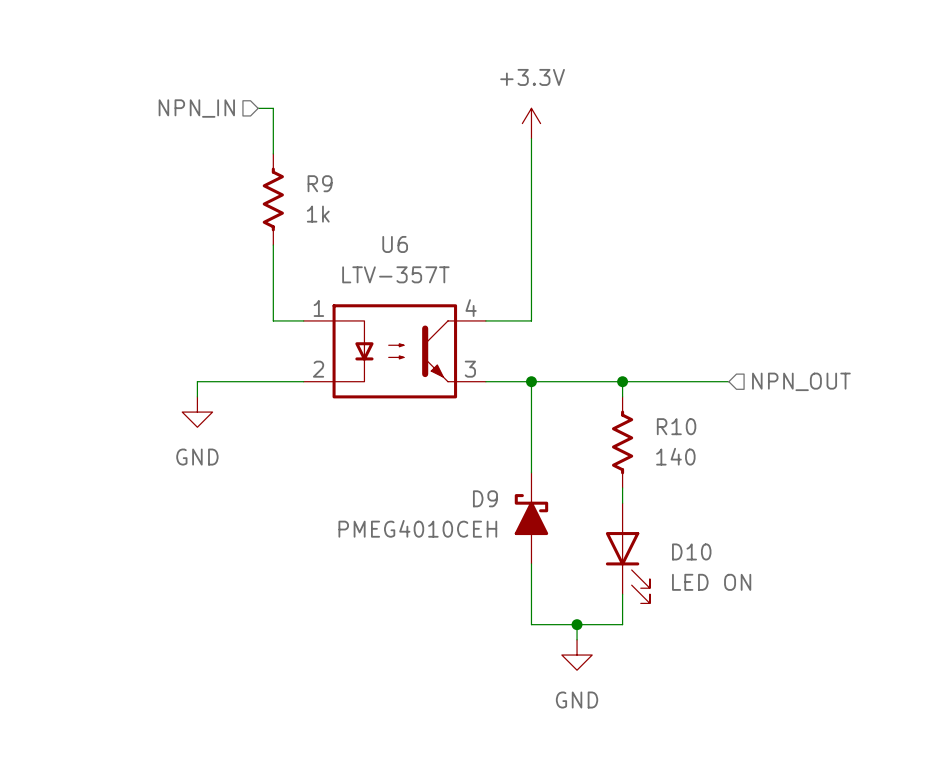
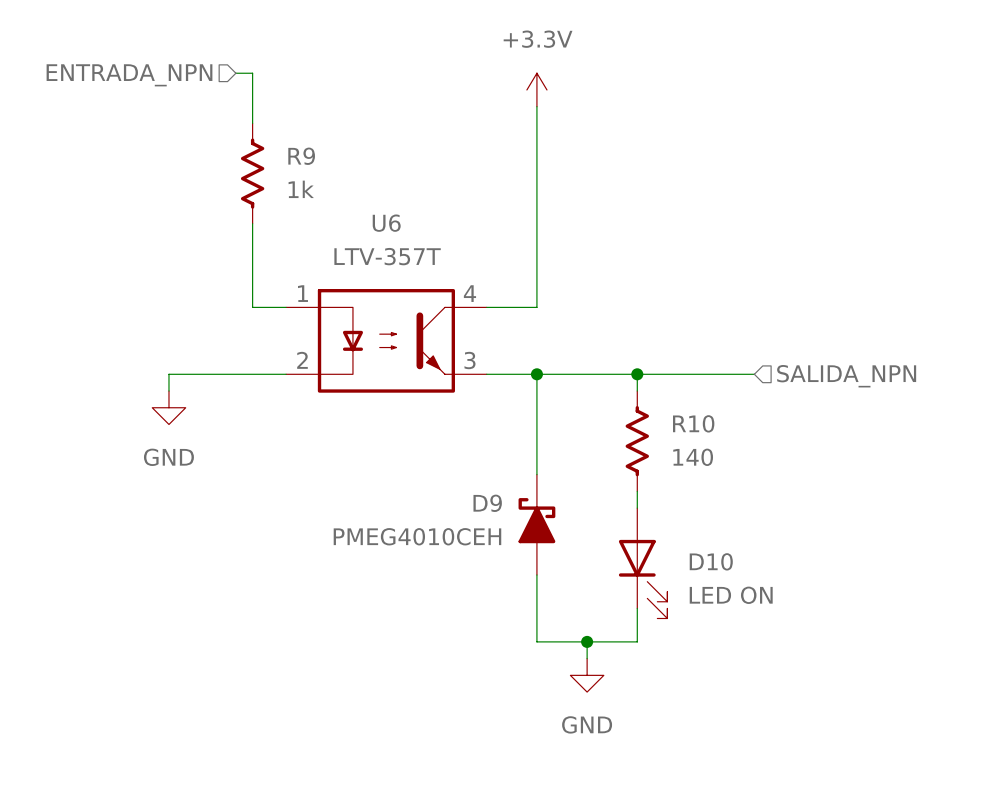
hierarchical label: NPN_IN (196, 108) -> ENTRADA_NPN (129, 75)
hierarchical label: NPN_OUT (801, 381) -> SALIDA_NPN (846, 376)

